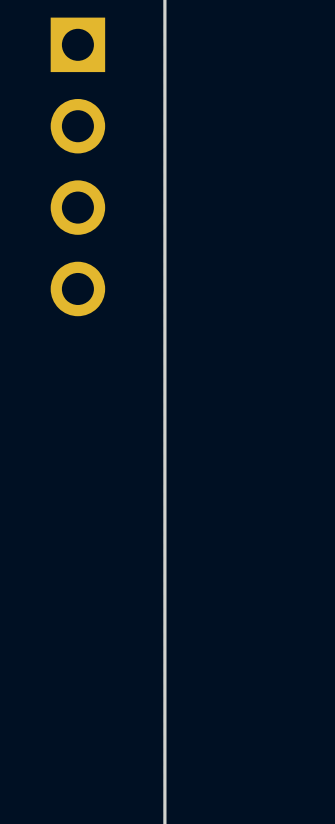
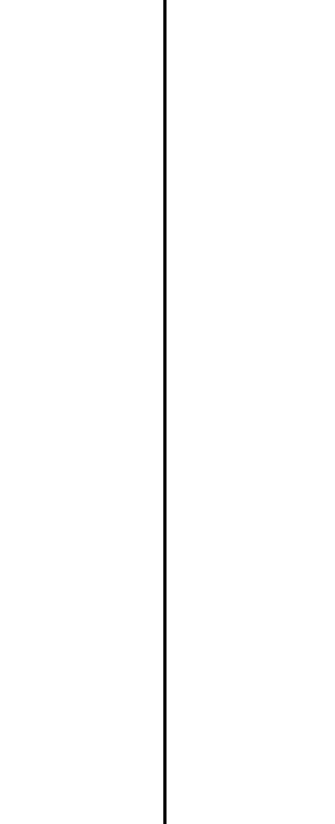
part: (77, 166) -> none

